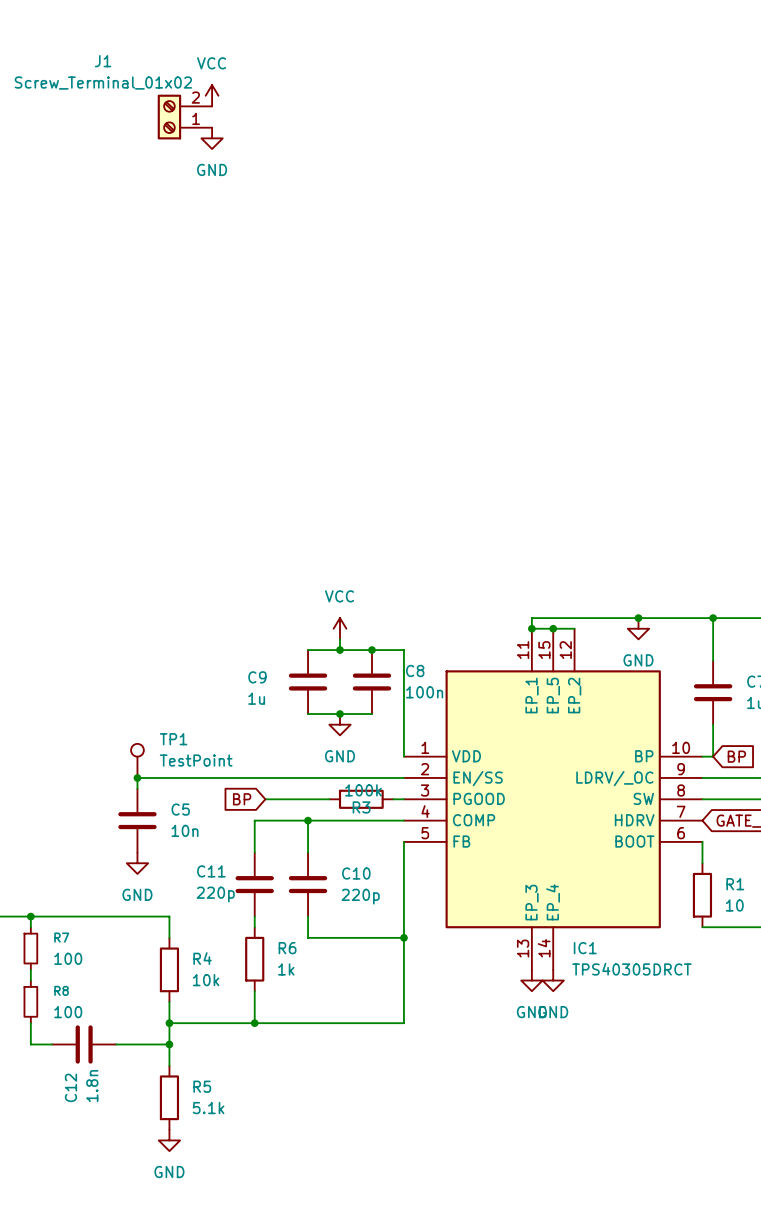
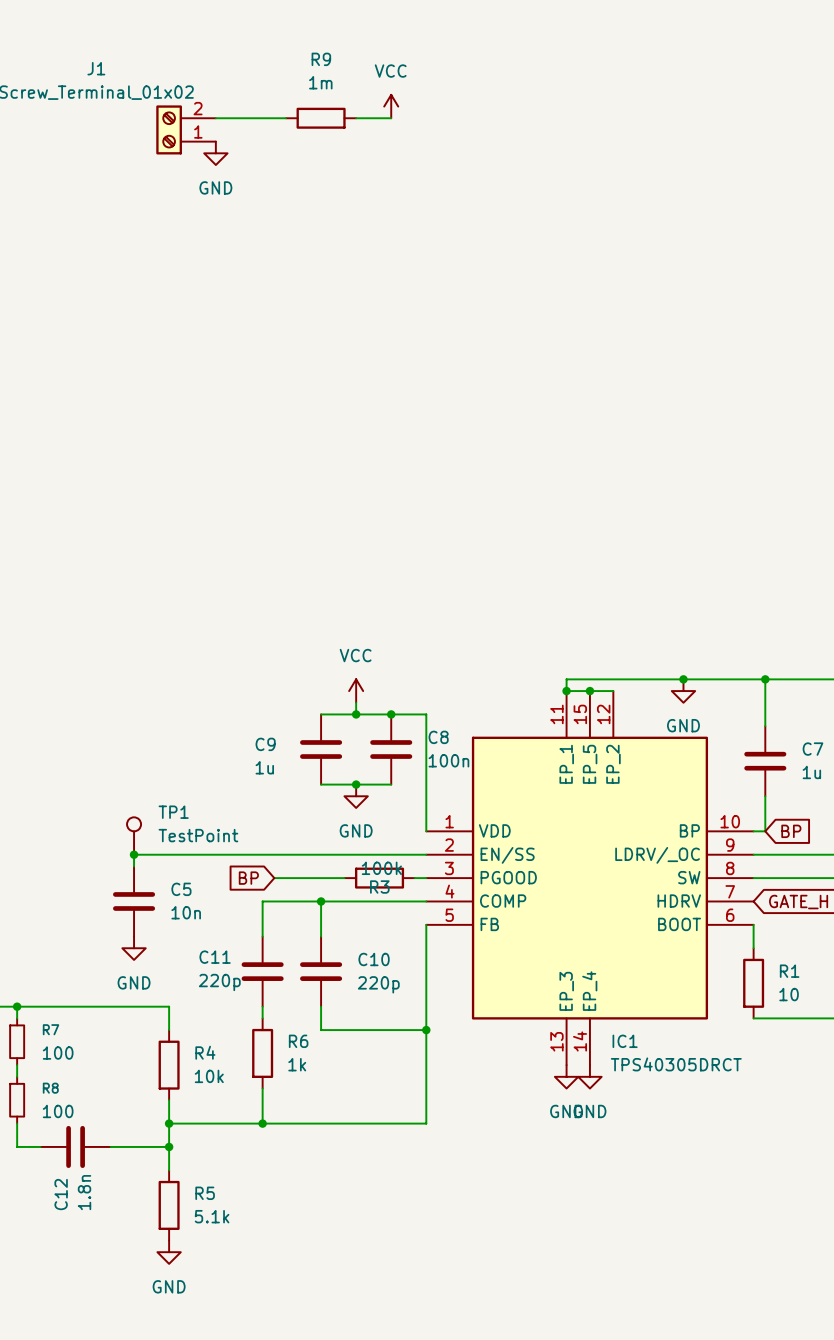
power symbol position: VCC (212, 95) -> VCC (391, 106)
wire: none -> (215, 118) (286, 118)
R9: none -> 1m (321, 118)
wire: none -> (356, 118) (391, 118)

